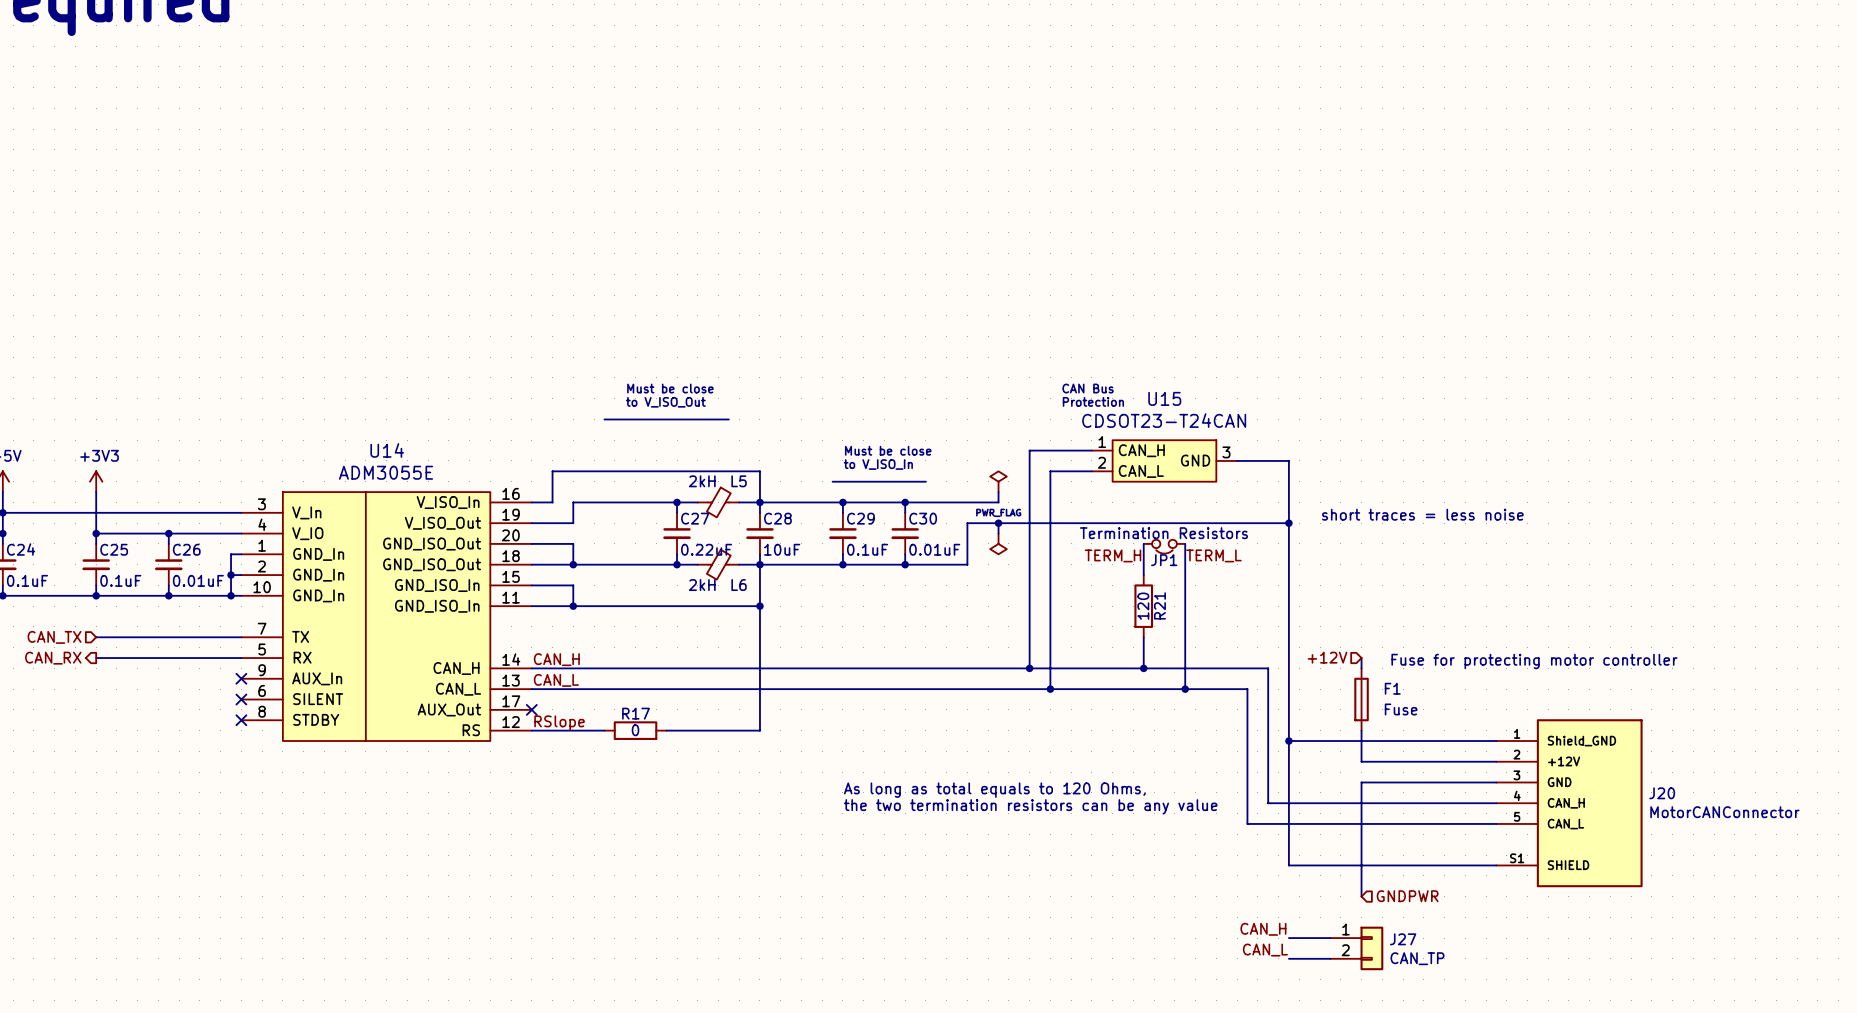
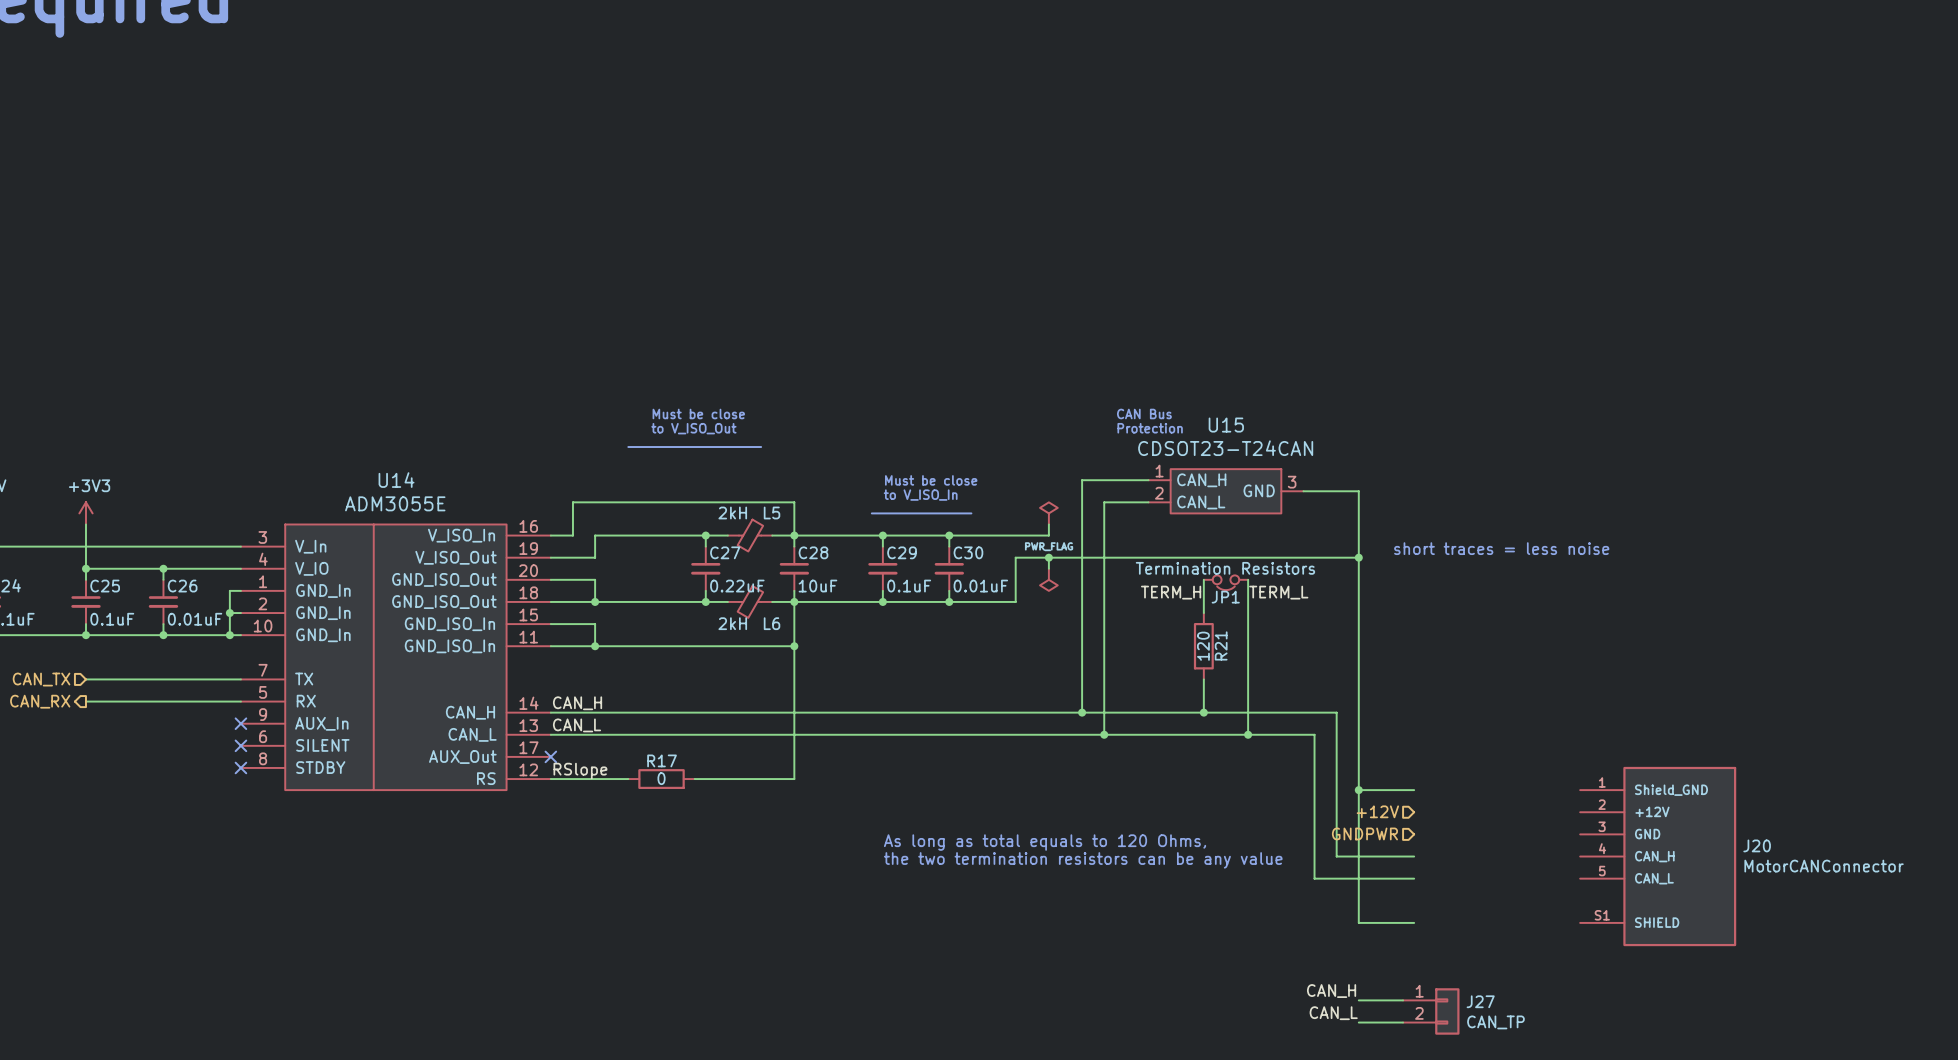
hierarchical label position: +12V (1327, 657) -> +12V (1377, 811)
wire: (1361, 658) (1361, 668) -> none
text: Fuse for protecting motor controller (1534, 661) -> none
F1: Fuse (1361, 699) -> none
wire: (1361, 730) (1361, 761) (1496, 761) -> none
wire: (1340, 741) (1496, 741) -> none
wire: (1496, 782) (1361, 782) (1361, 896) -> none
wire: (1340, 803) (1496, 803) -> none
wire: (1340, 823) (1496, 823) -> none
wire: (1340, 865) (1496, 865) -> none
hierarchical label rotation: 0° (1407, 896) -> 180° (1364, 833)
hierarchical label position: GNDPWR (1407, 896) -> GNDPWR (1364, 833)

